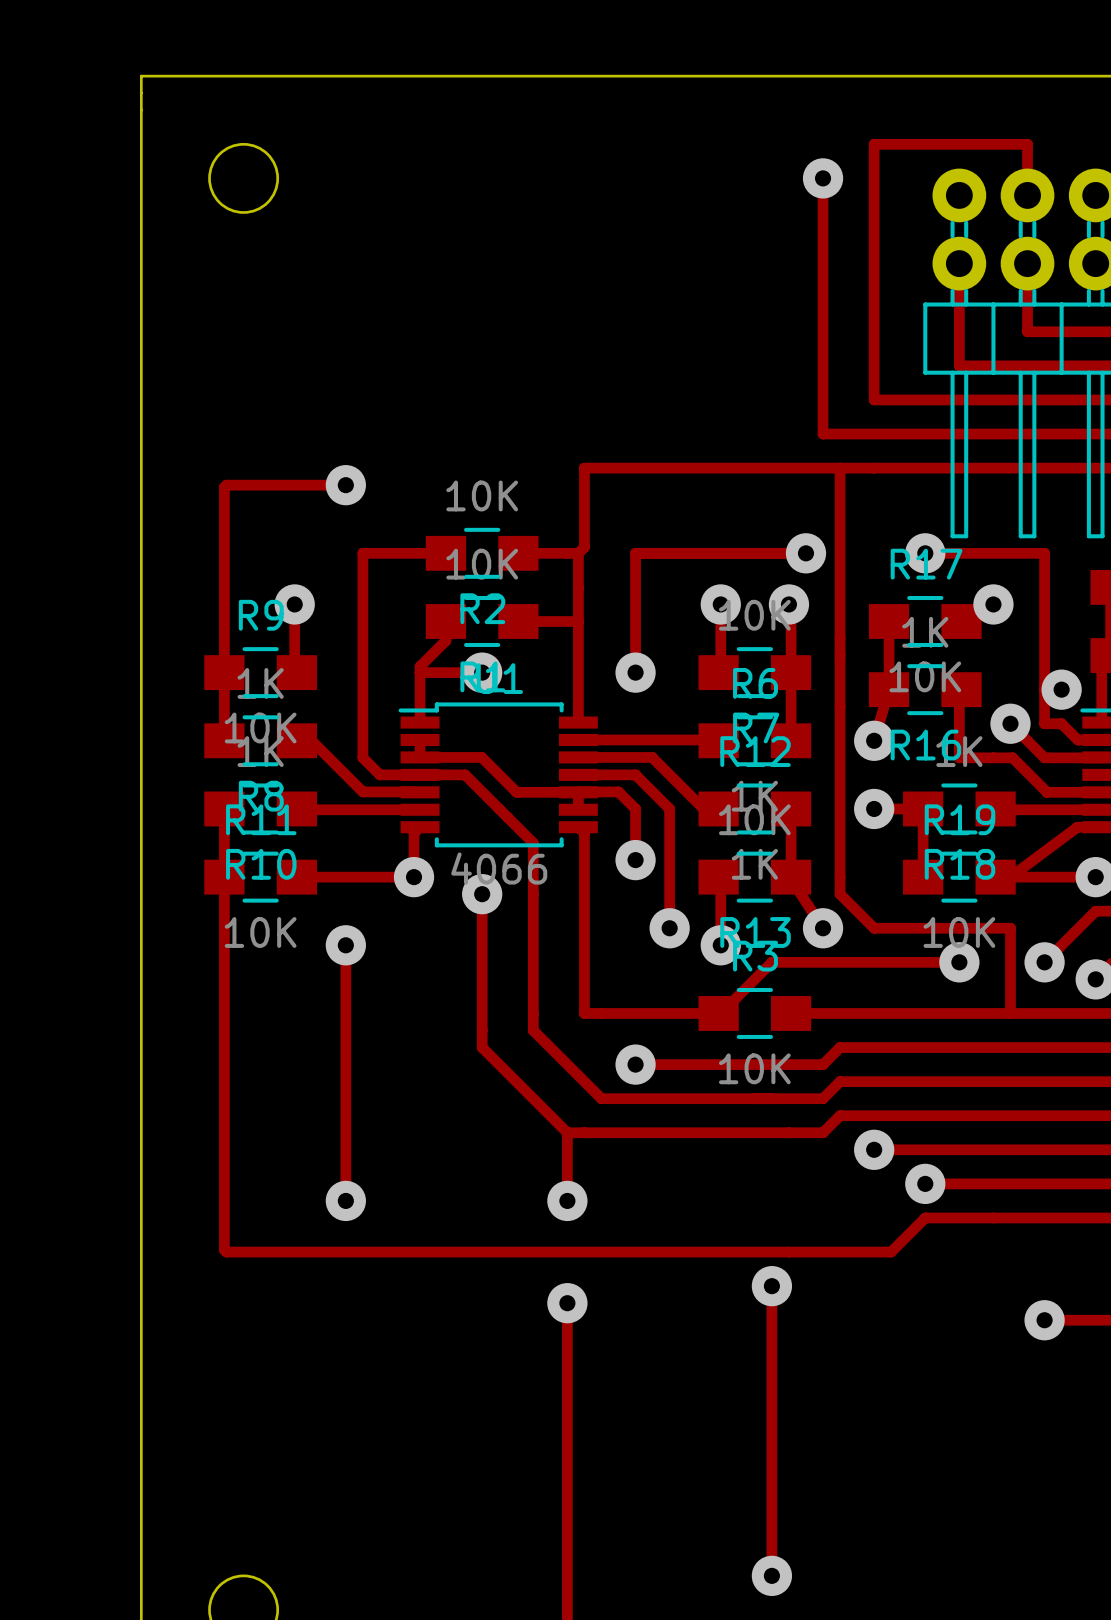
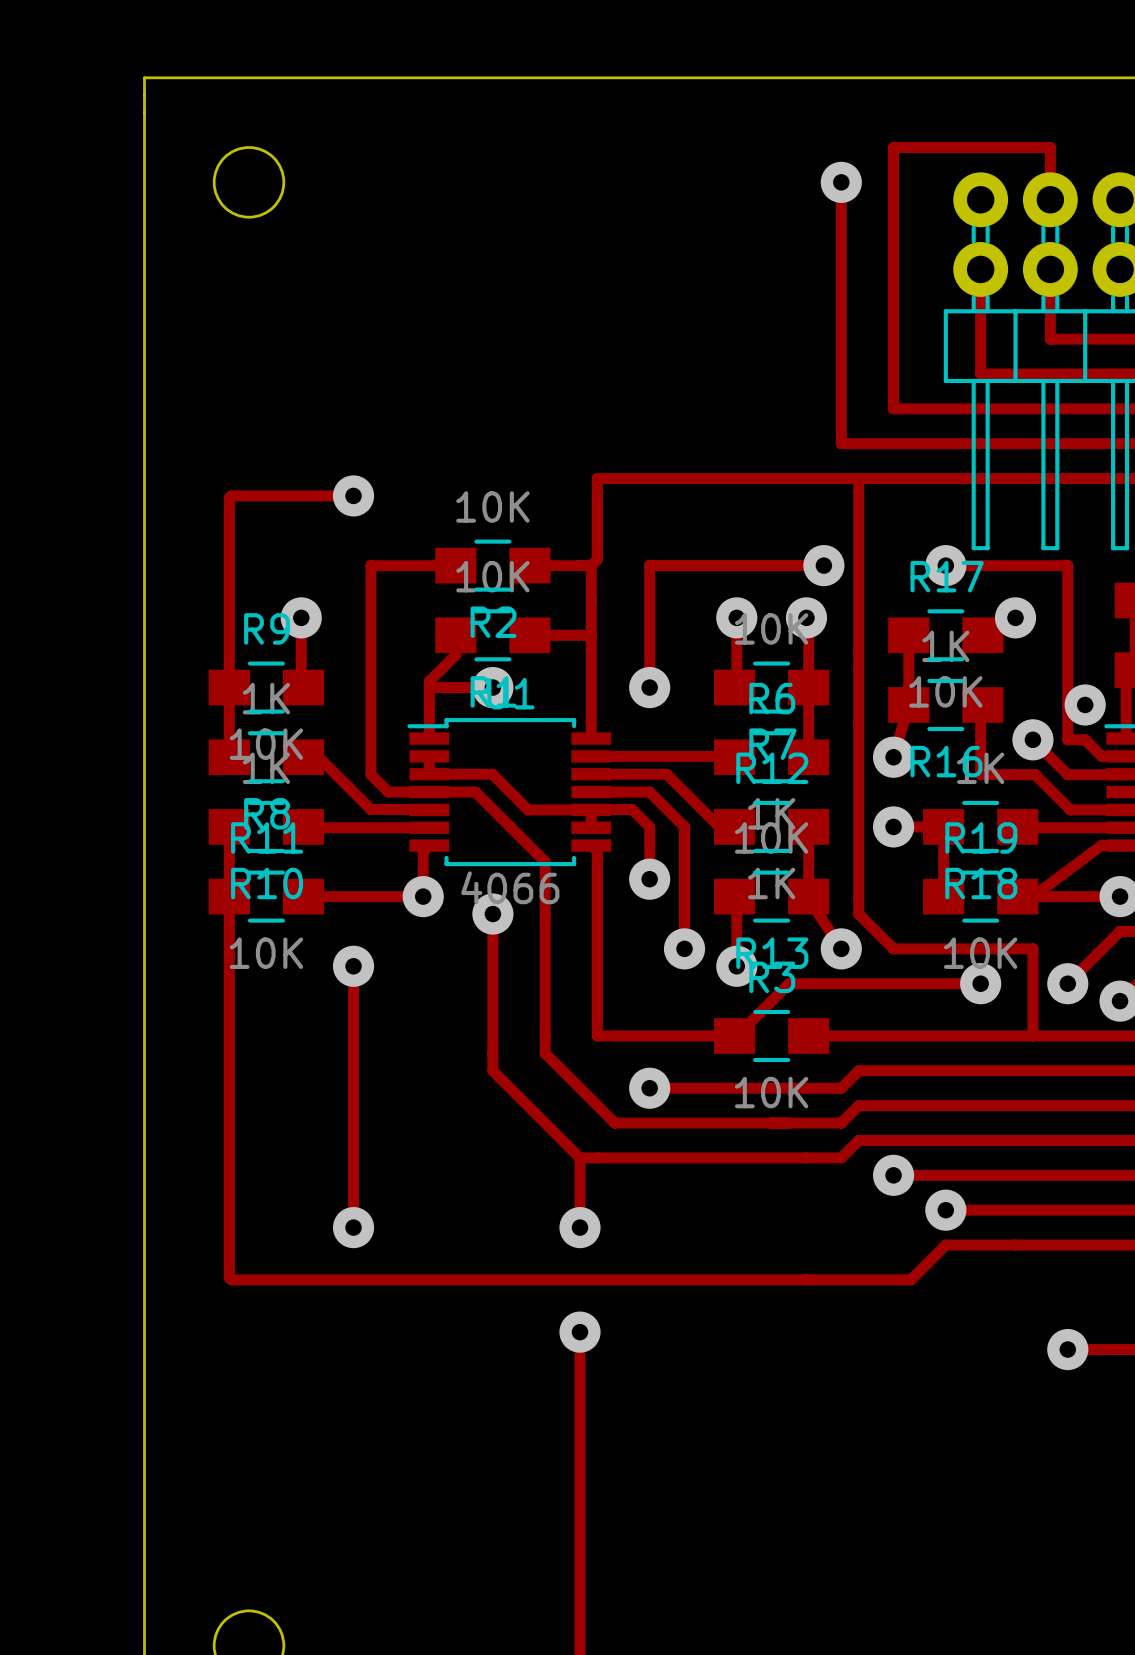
track: (771, 1286) (771, 1575) -> none
via: (771, 1286) -> none
via: (771, 1575) -> none

